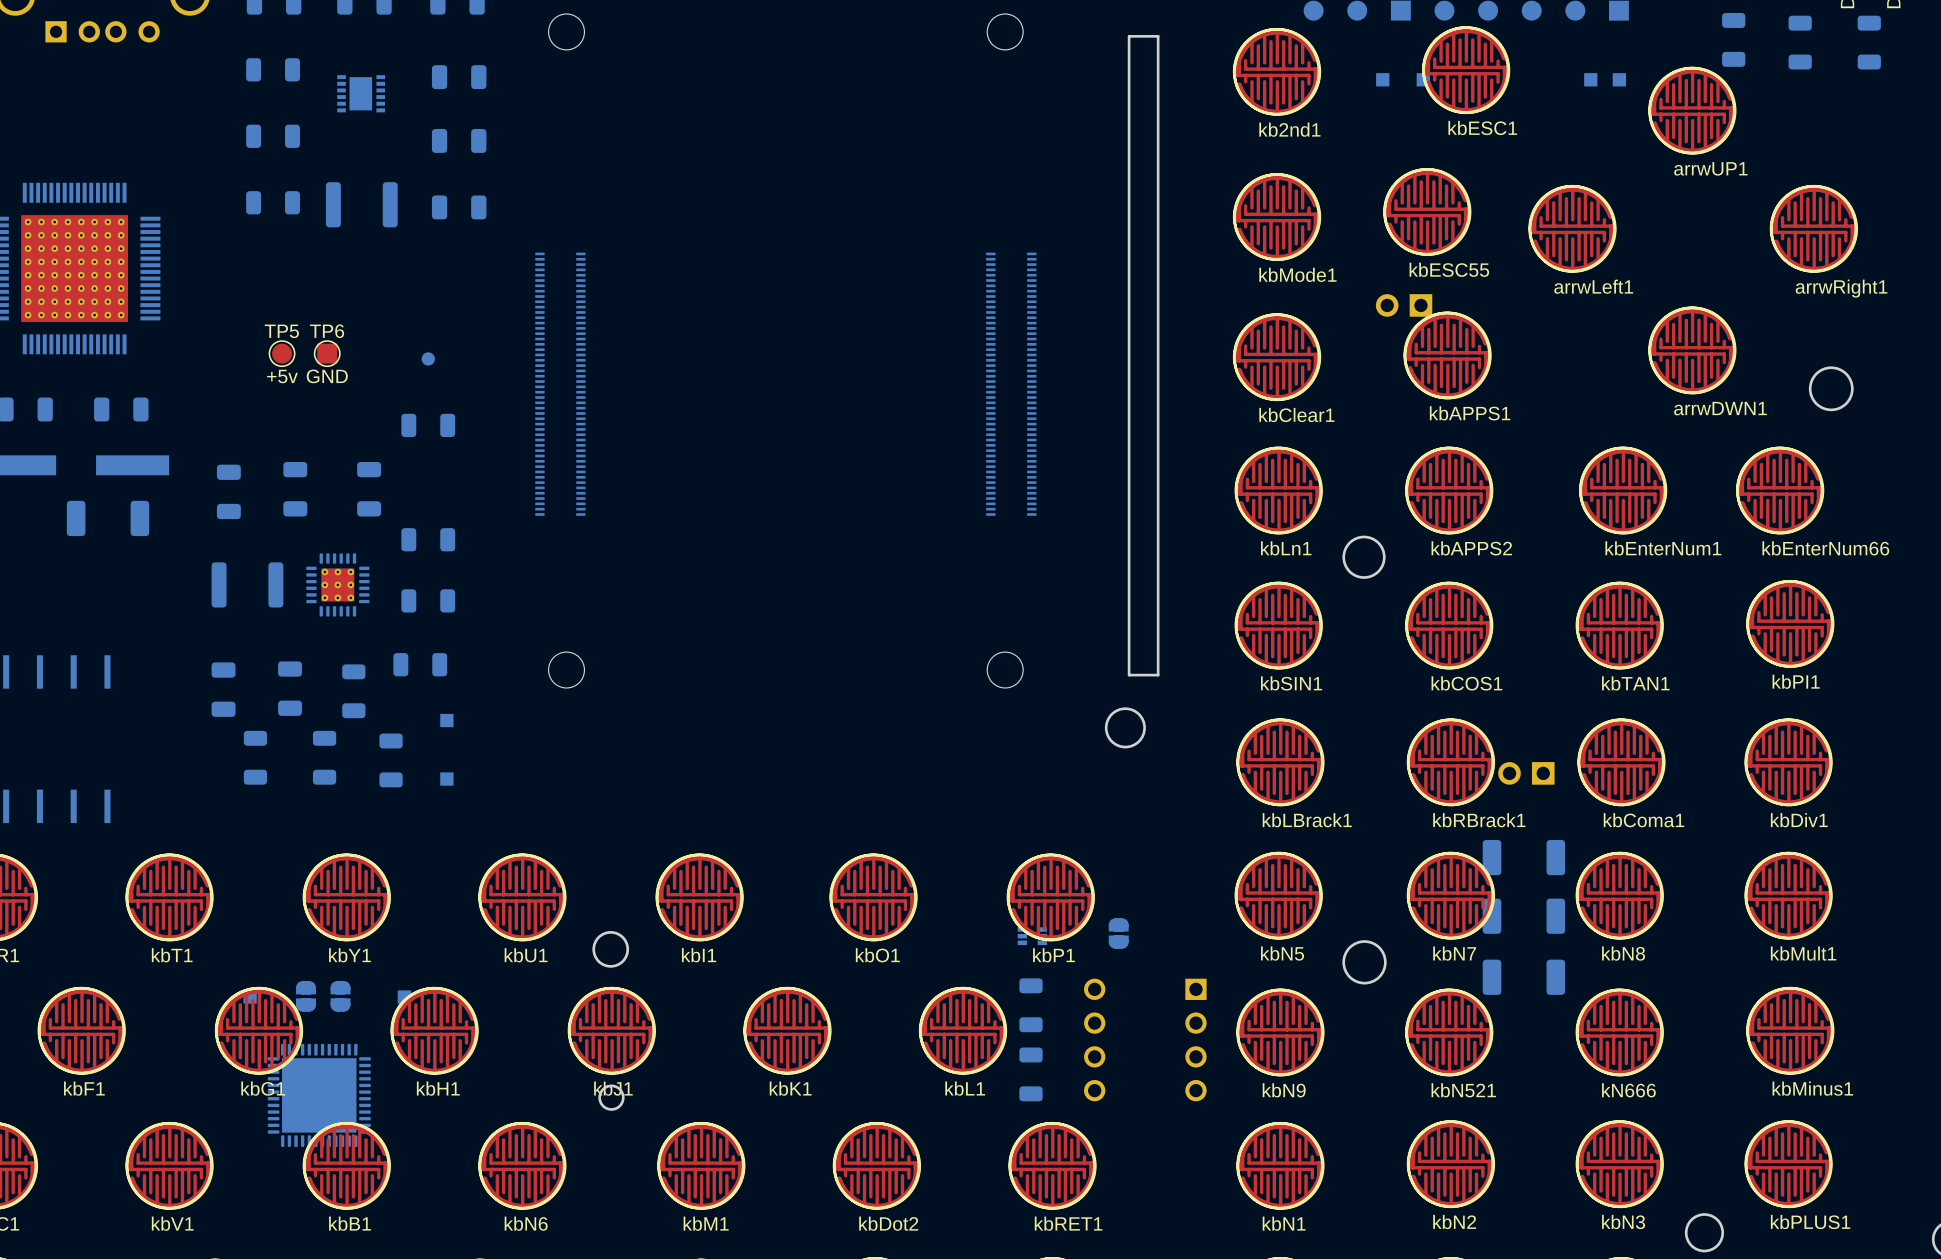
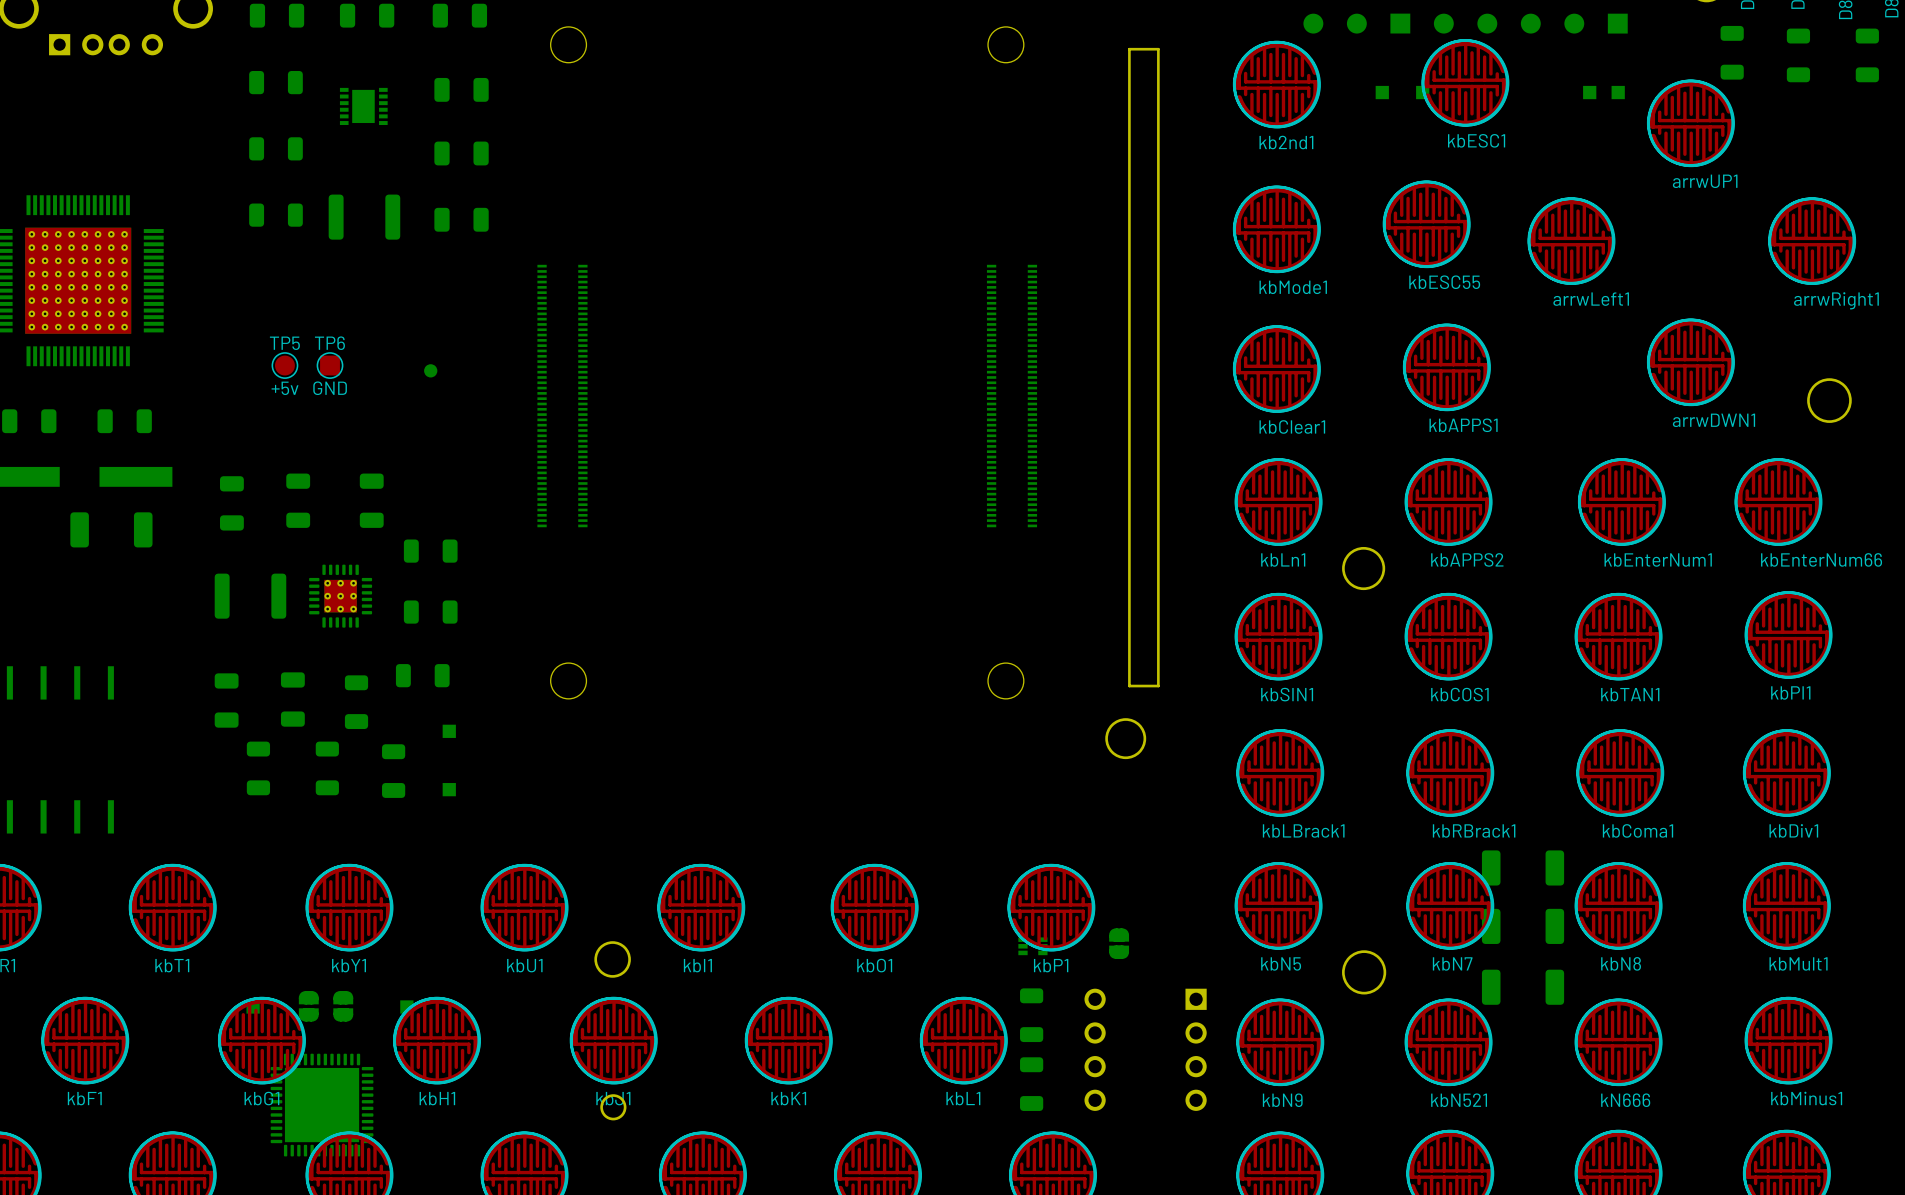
part: (1404, 305) -> none
part: (428, 425) -> none
part: (1526, 773) -> none

